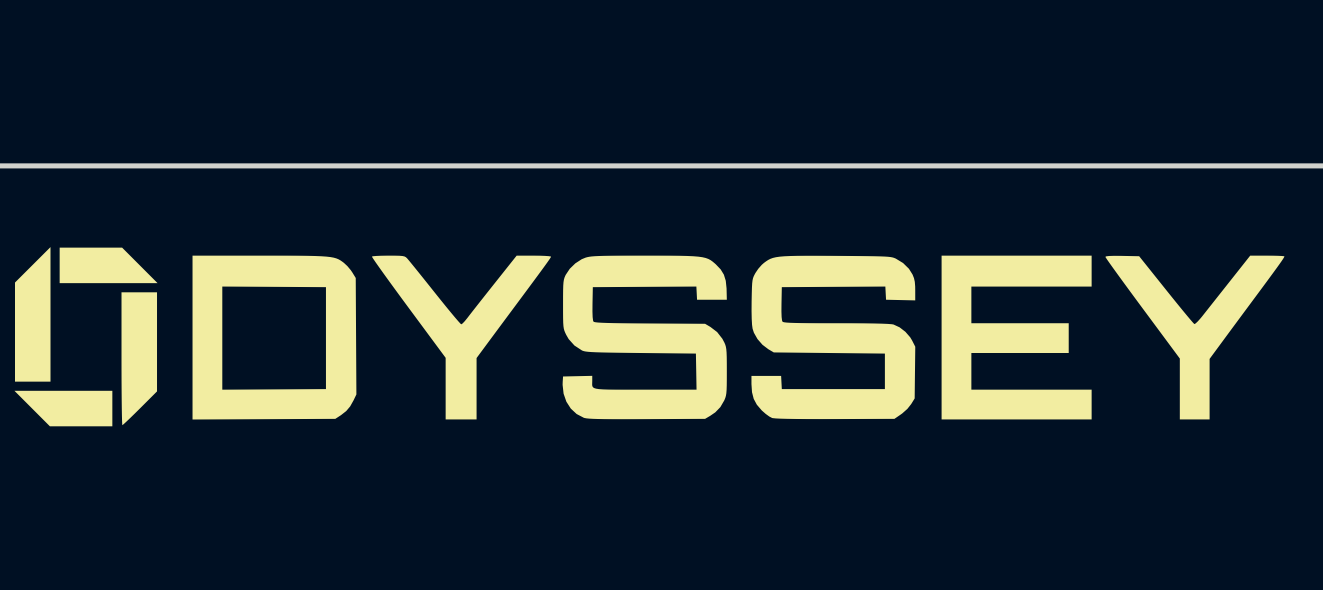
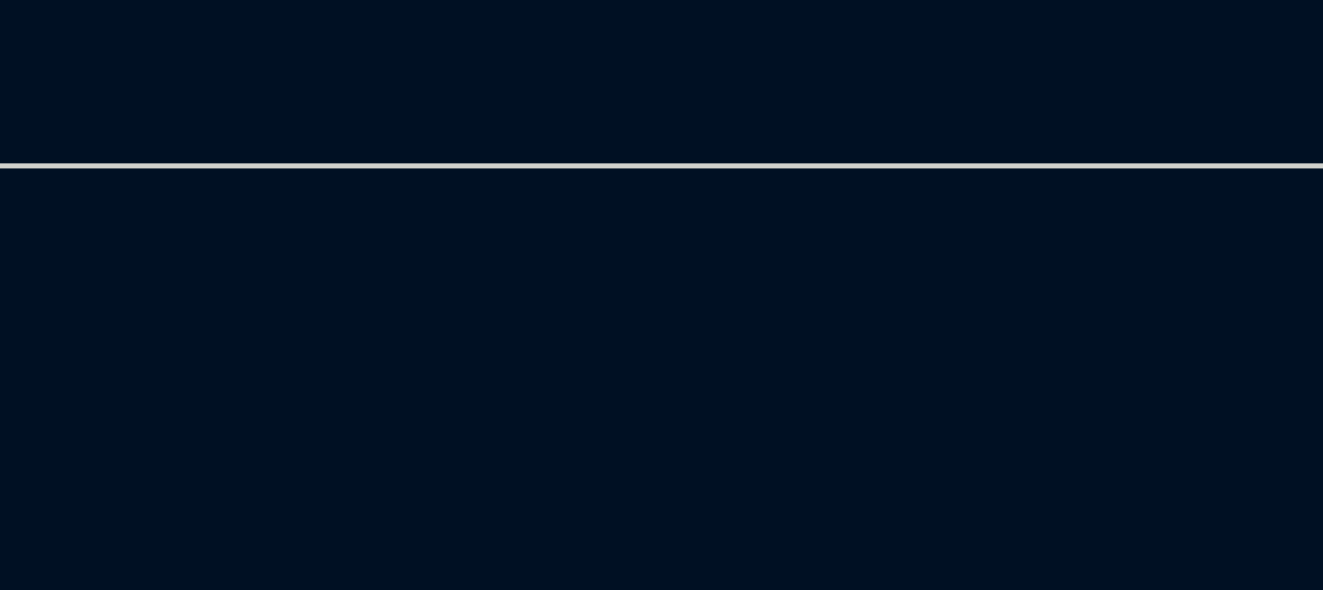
drawing: [14, 247, 1285, 427] -> none

